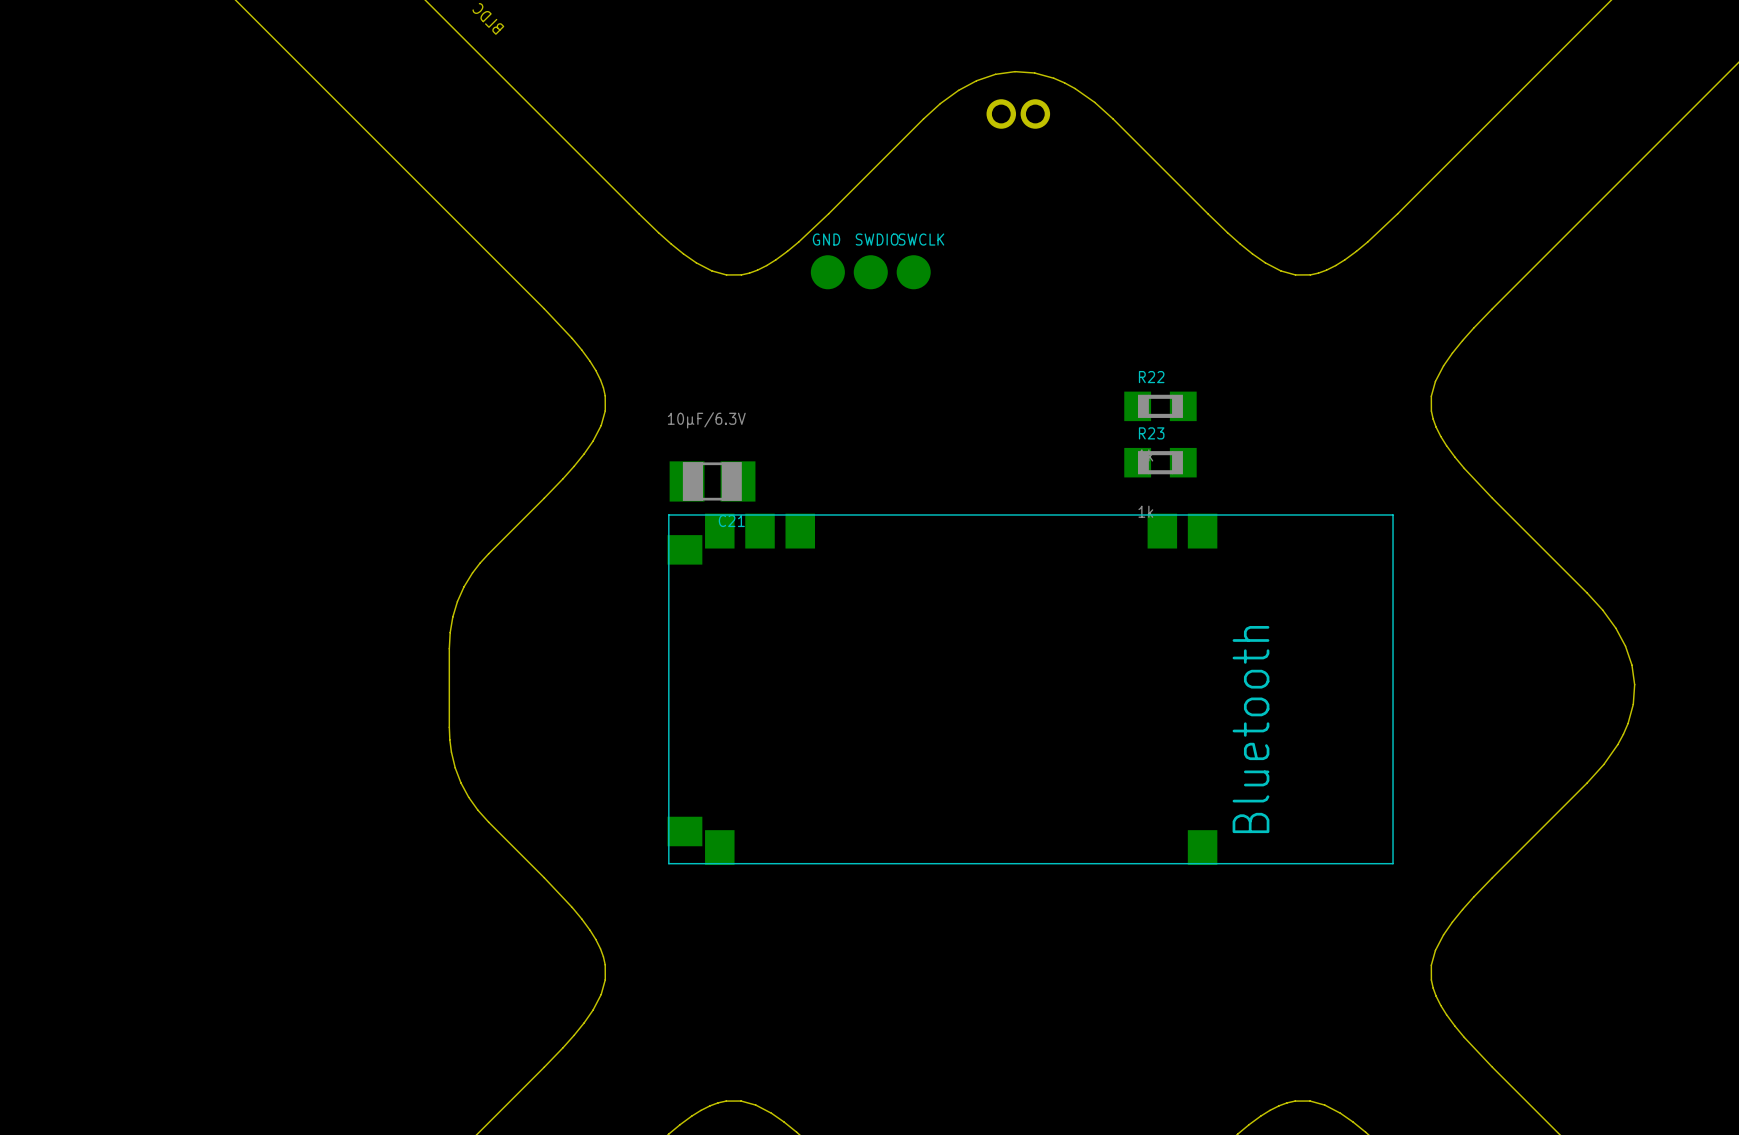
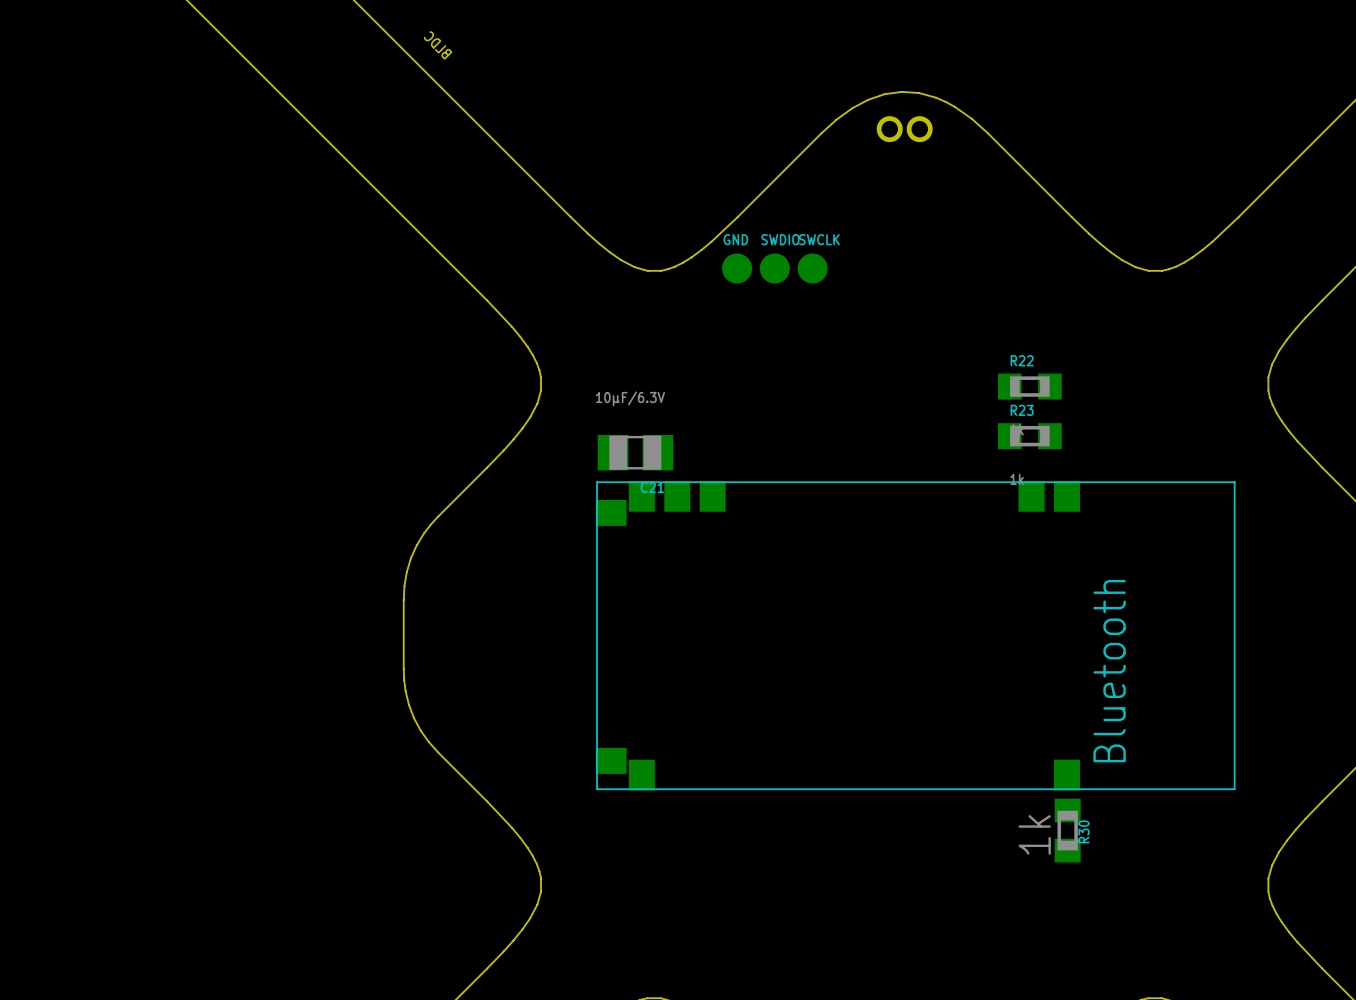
R30: none -> 1k (1067, 830)

